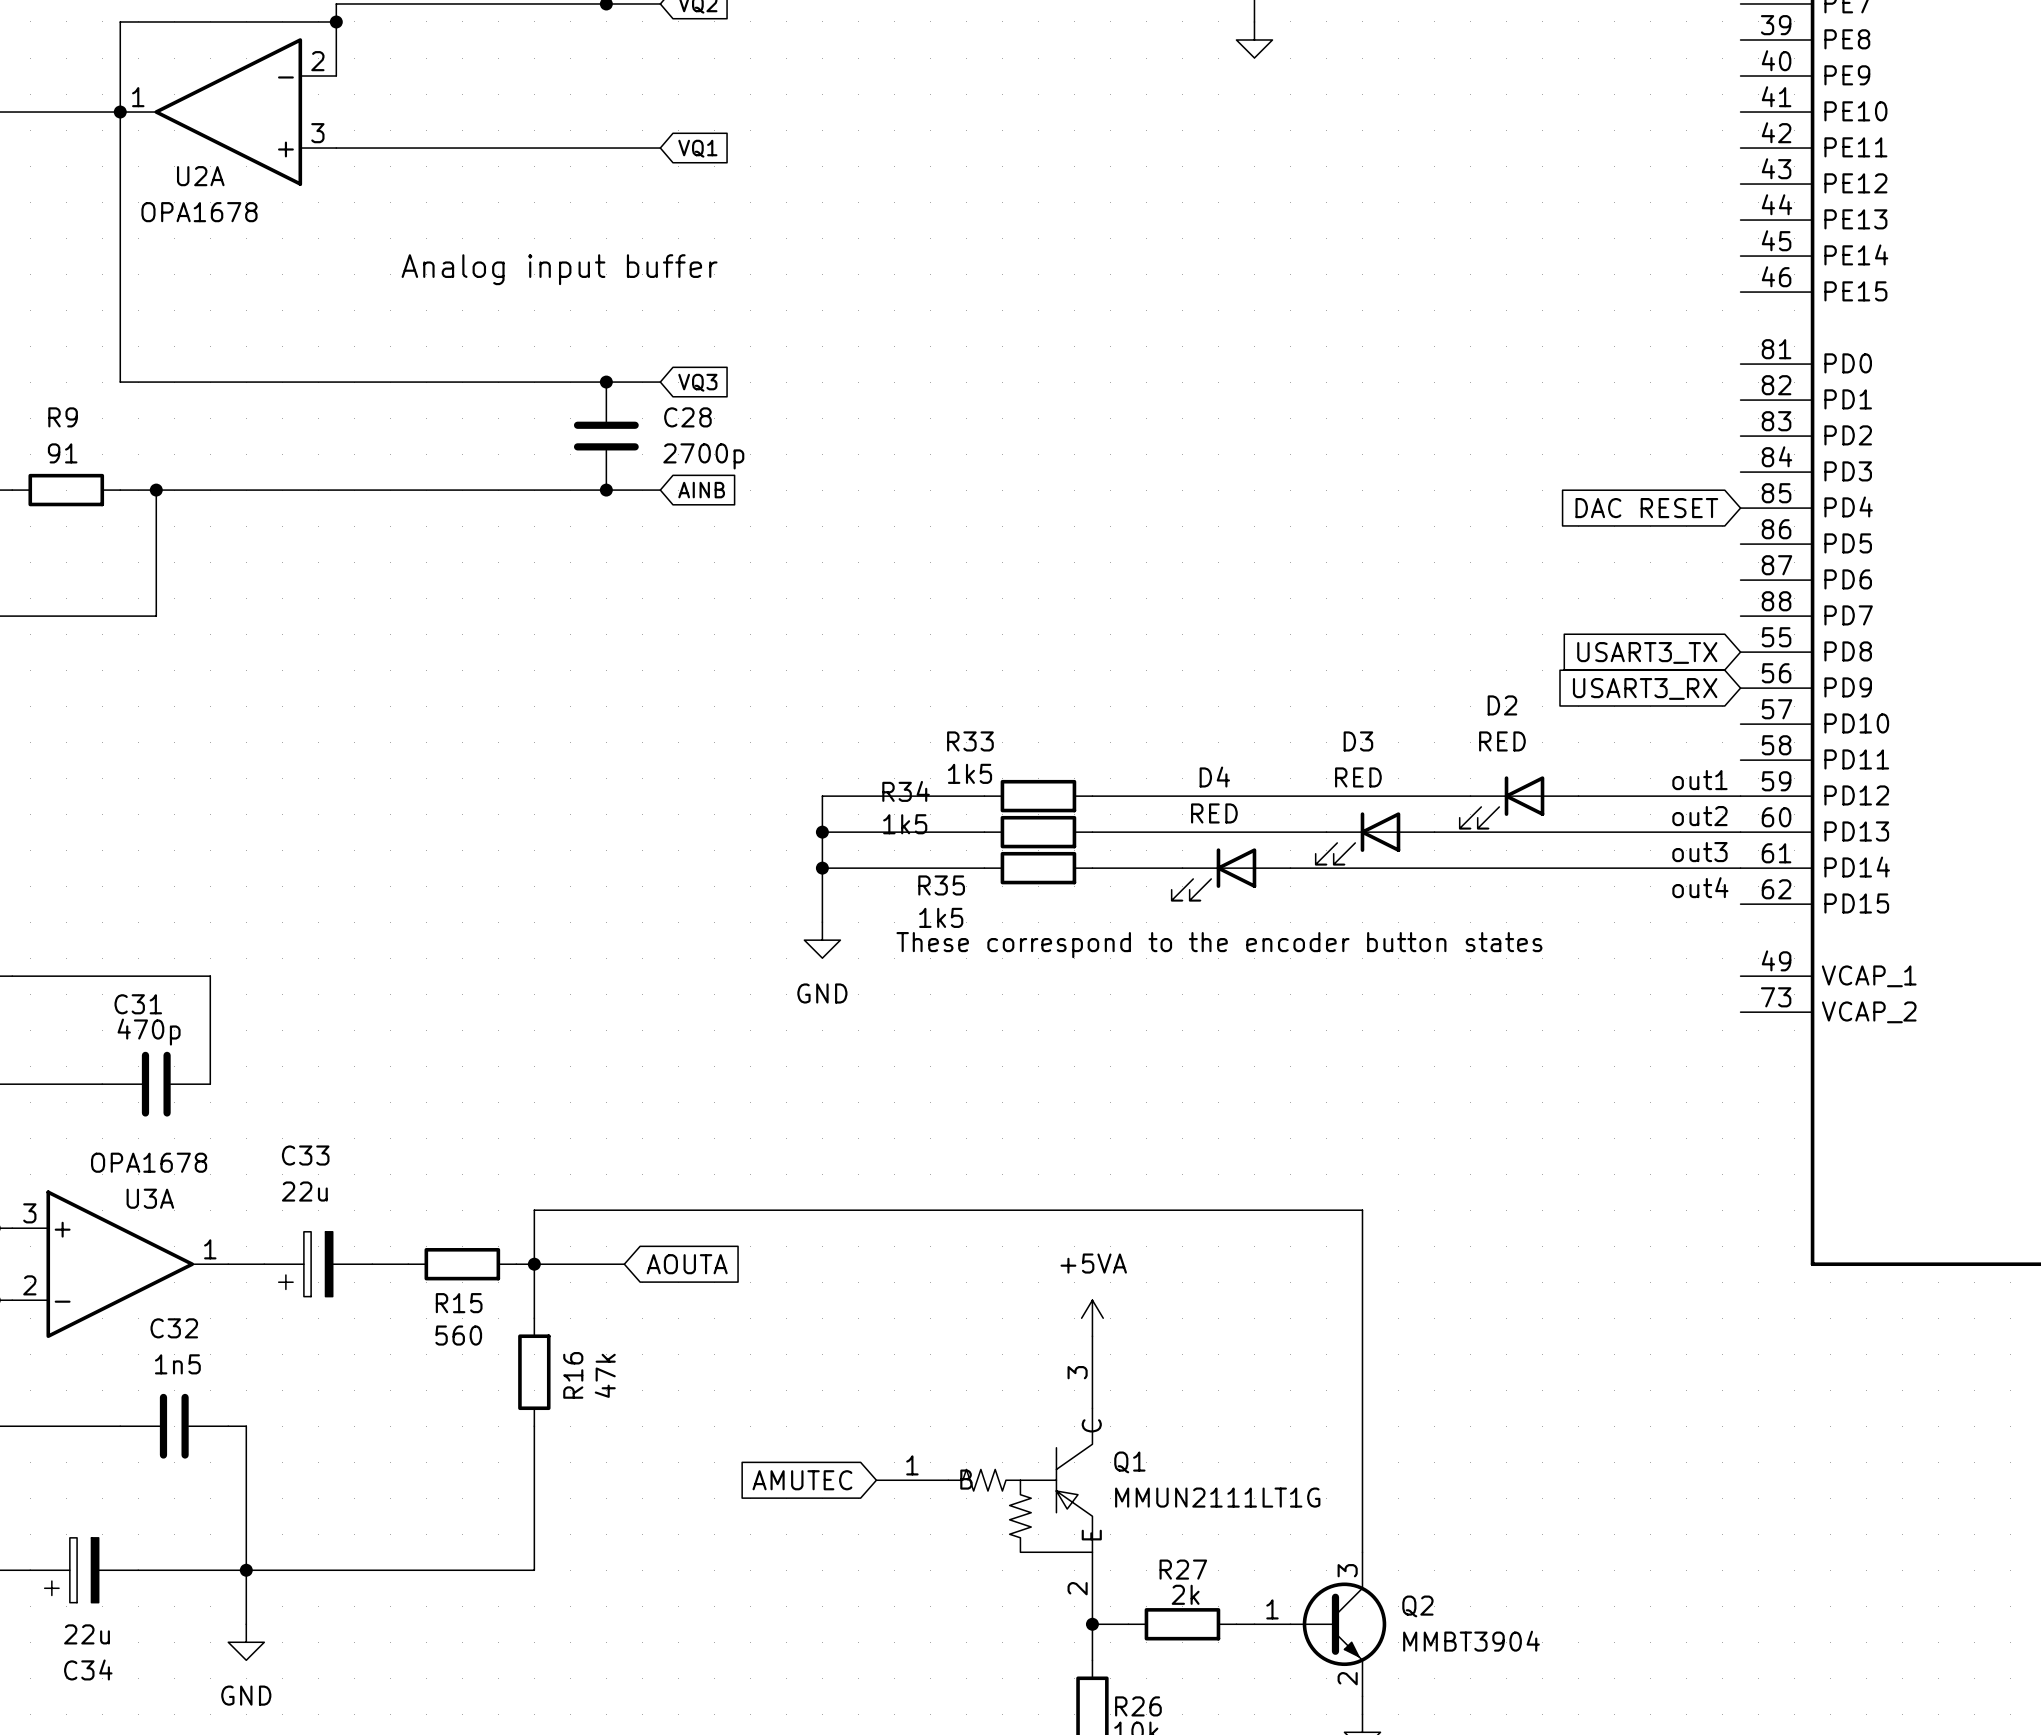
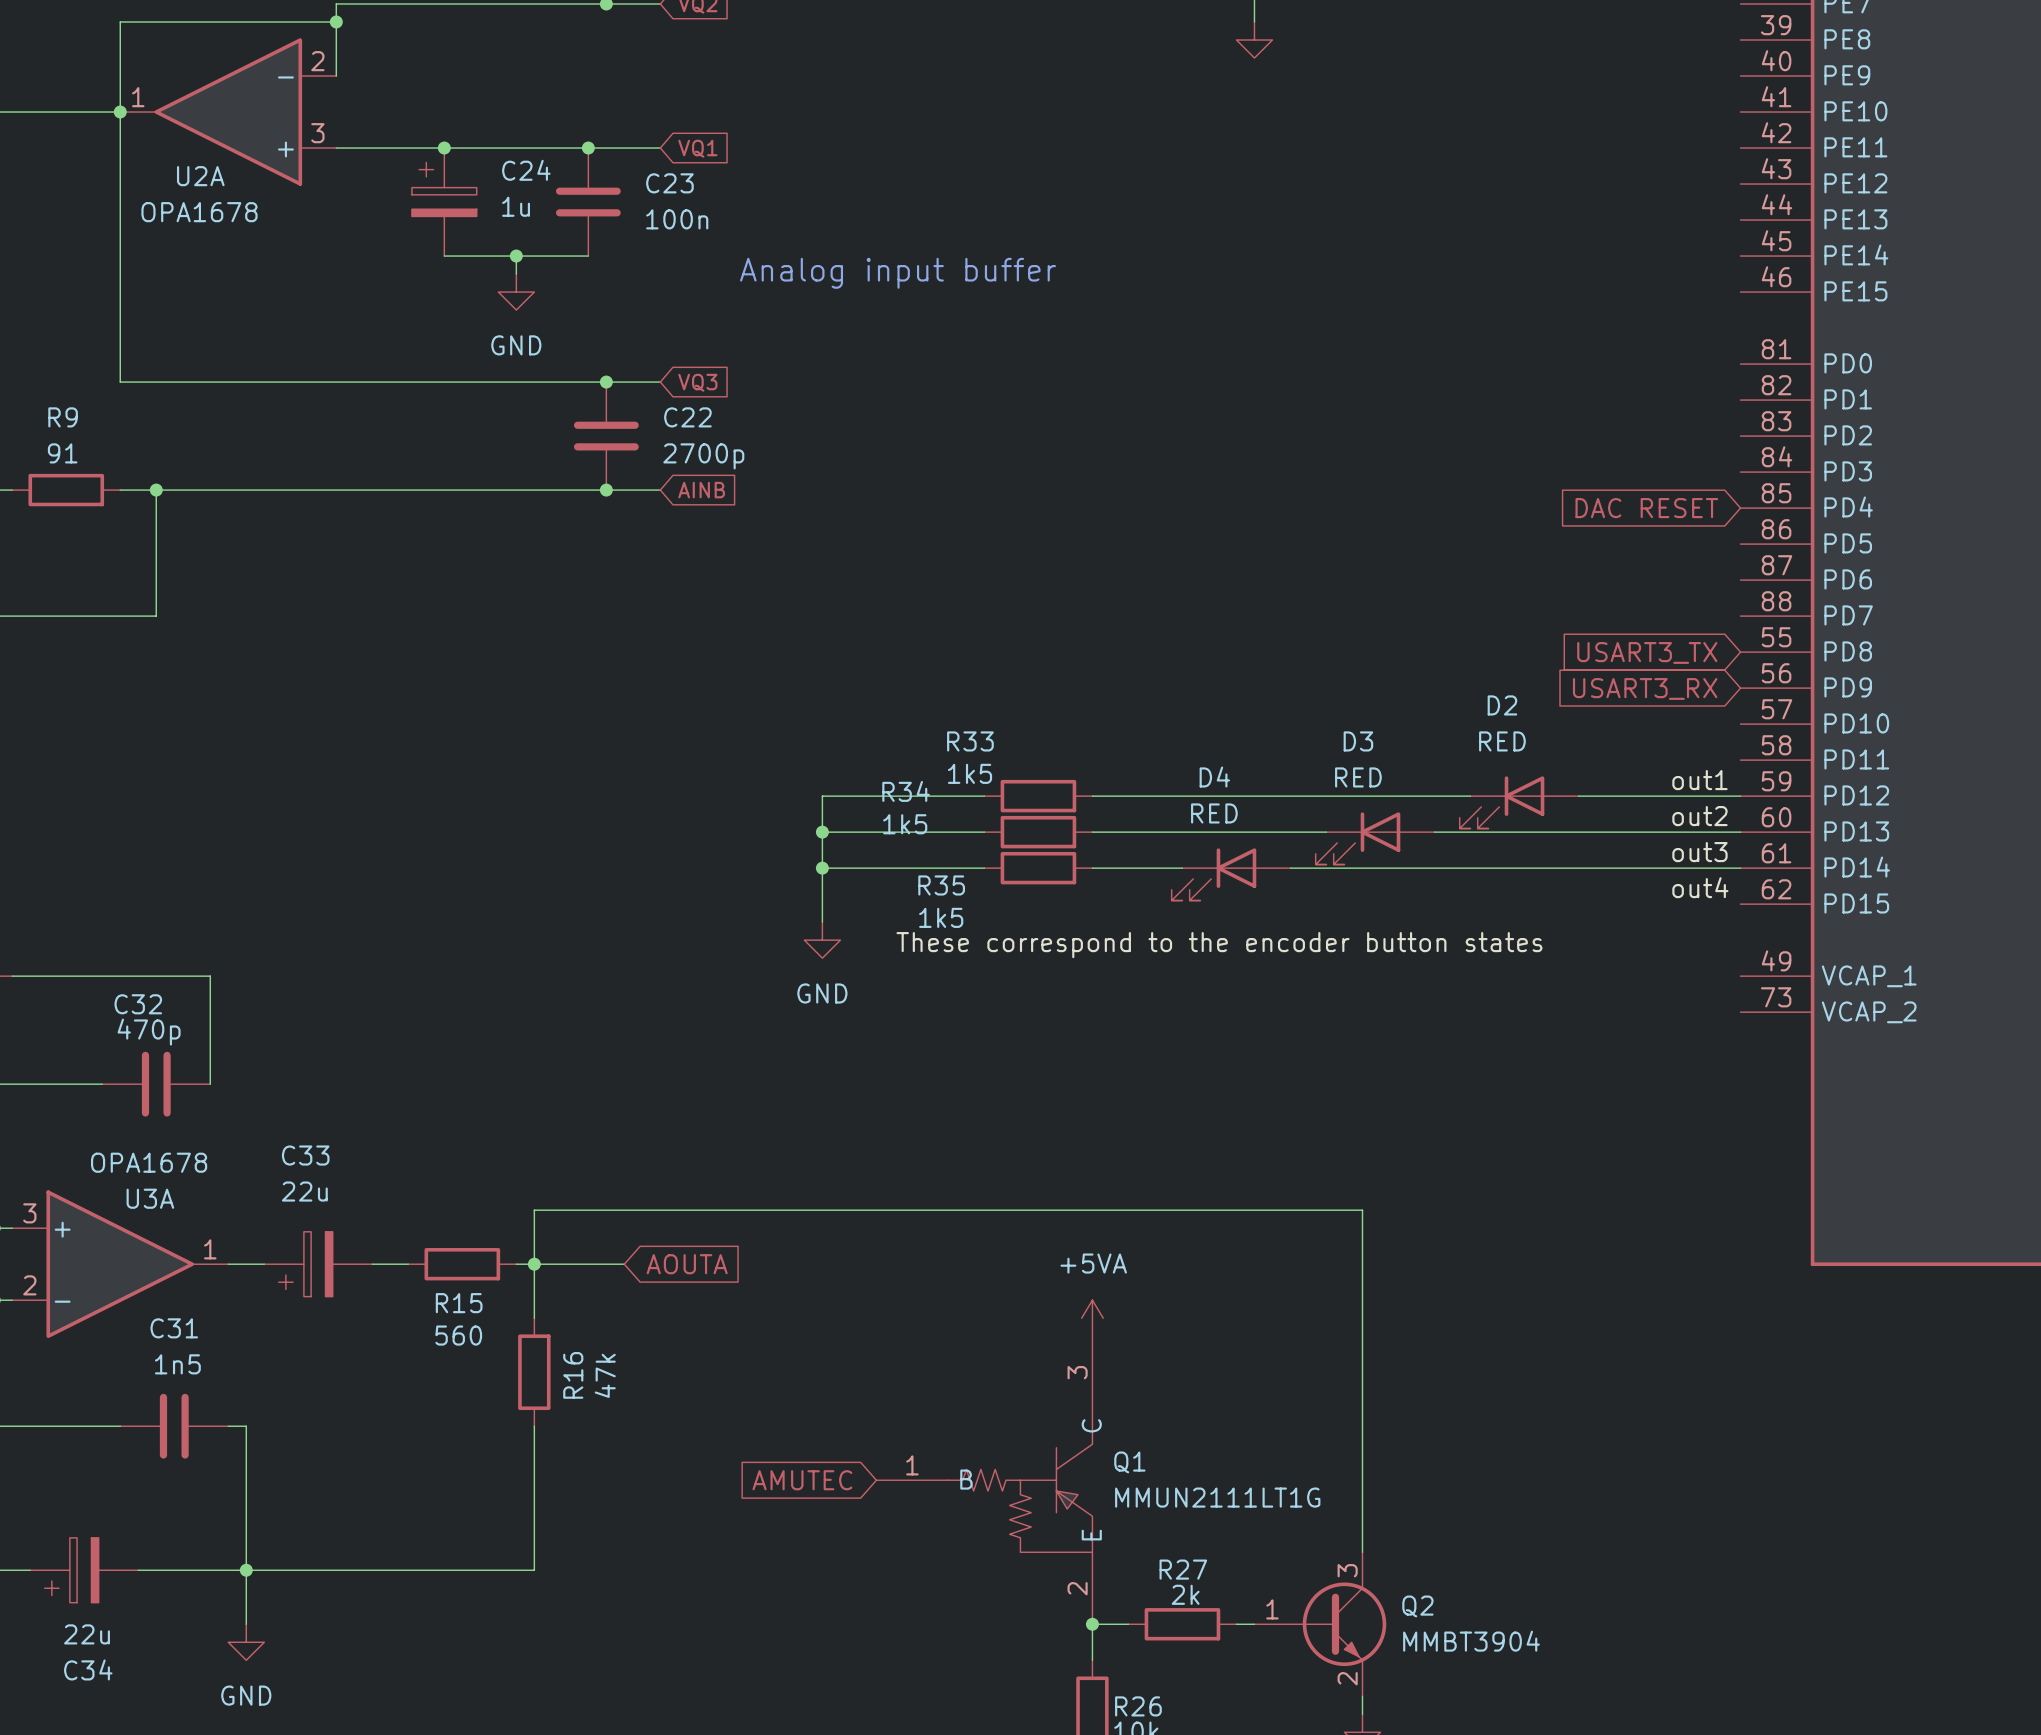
junction: none -> (444, 148)
junction: none -> (588, 148)
C24: none -> 1u (444, 202)
C23: none -> 100n (588, 202)
wire: none -> (444, 256) (588, 256)
wire: none -> (516, 256) (516, 274)
junction: none -> (516, 256)
text position: Analog input buffer (559, 269) -> Analog input buffer (898, 273)
power symbol: none -> GND (516, 292)
C28 name: C28 (687, 417) -> C22 (687, 417)
C31 name: C31 (138, 1004) -> C32 (138, 1004)
C32 name: C32 (174, 1328) -> C31 (174, 1328)

